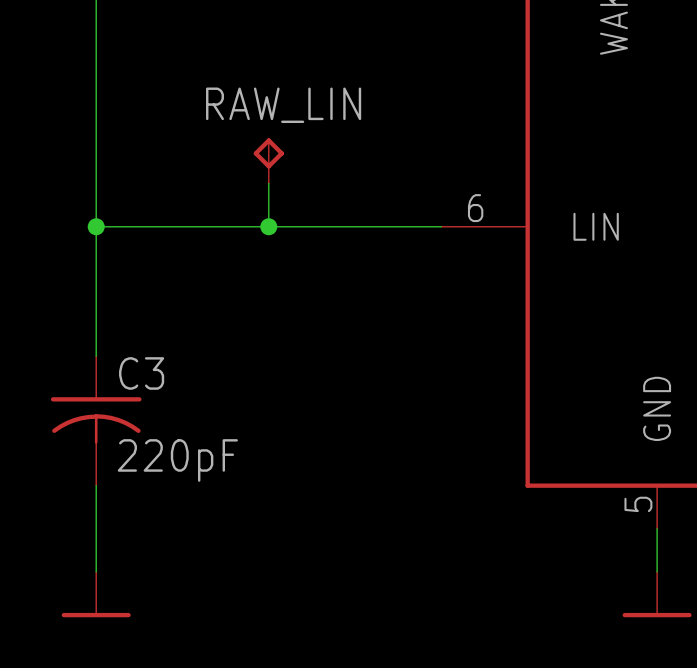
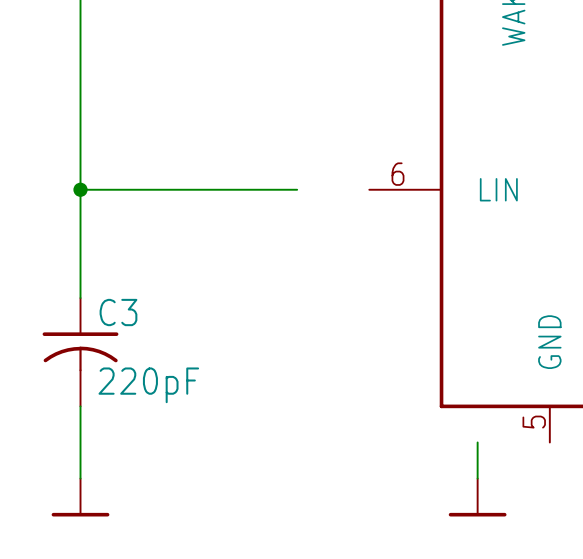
RAW_LIN: (268, 160) -> none
wire: (268, 183) (268, 226) -> none
junction: (268, 226) -> none
wire: (355, 226) (441, 226) -> none
wire: (657, 528) (657, 571) -> (477, 442) (477, 478)
power symbol position: (657, 594) -> (477, 497)

